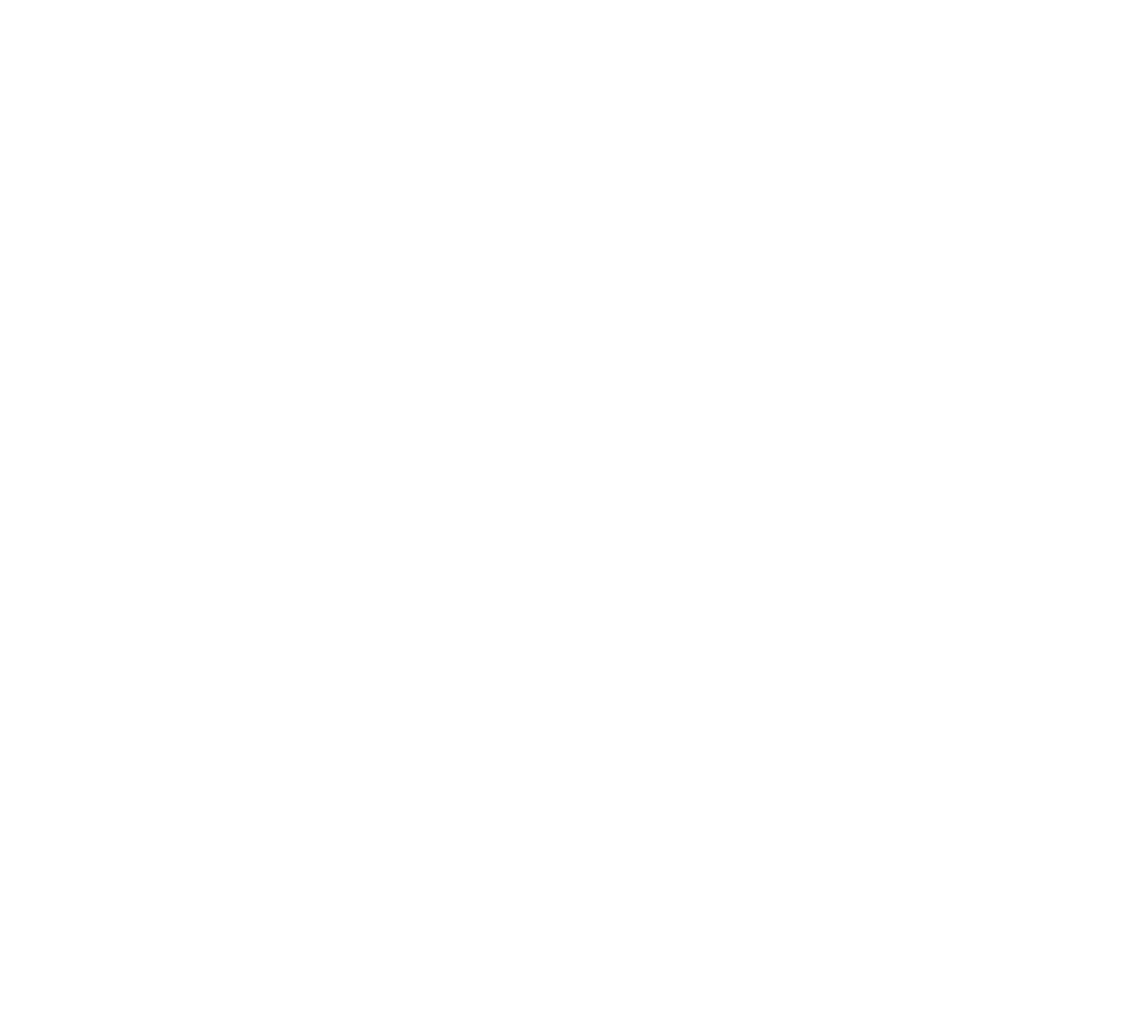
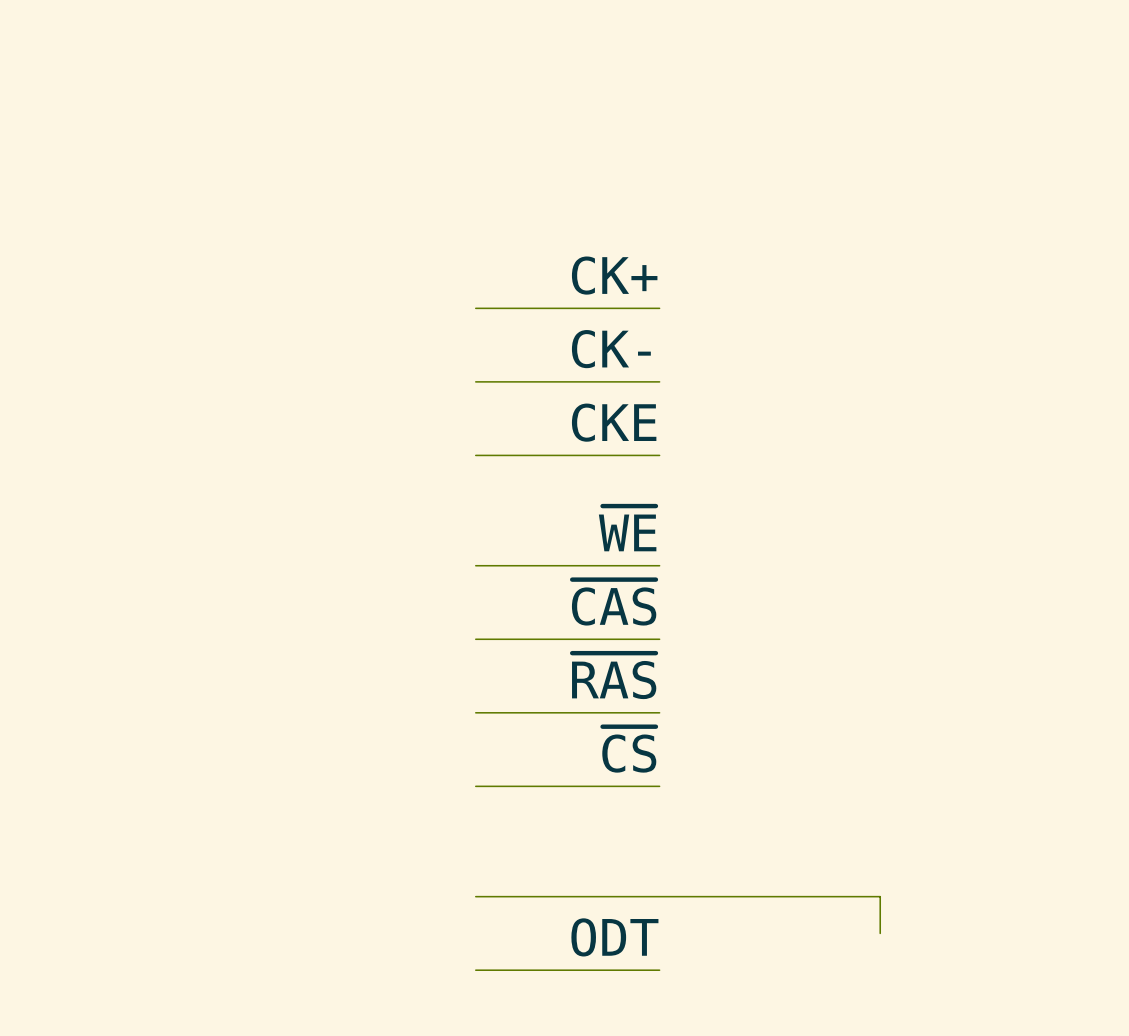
label: none -> CK+ (614, 275)
wire: none -> (475, 308) (659, 308)
label: none -> CK- (611, 349)
wire: none -> (475, 381) (659, 381)
label: none -> CKE (614, 422)
wire: none -> (475, 455) (659, 455)
label: none -> ~{WE} (627, 528)
wire: none -> (475, 565) (659, 565)
label: none -> ~{CAS} (614, 602)
wire: none -> (475, 639) (659, 639)
label: none -> ~{RAS} (614, 676)
wire: none -> (475, 712) (659, 712)
label: none -> ~{CS} (629, 749)
wire: none -> (475, 786) (659, 786)
wire: none -> (475, 896) (880, 896) (880, 933)
label: none -> ODT (614, 937)
wire: none -> (475, 970) (659, 970)

